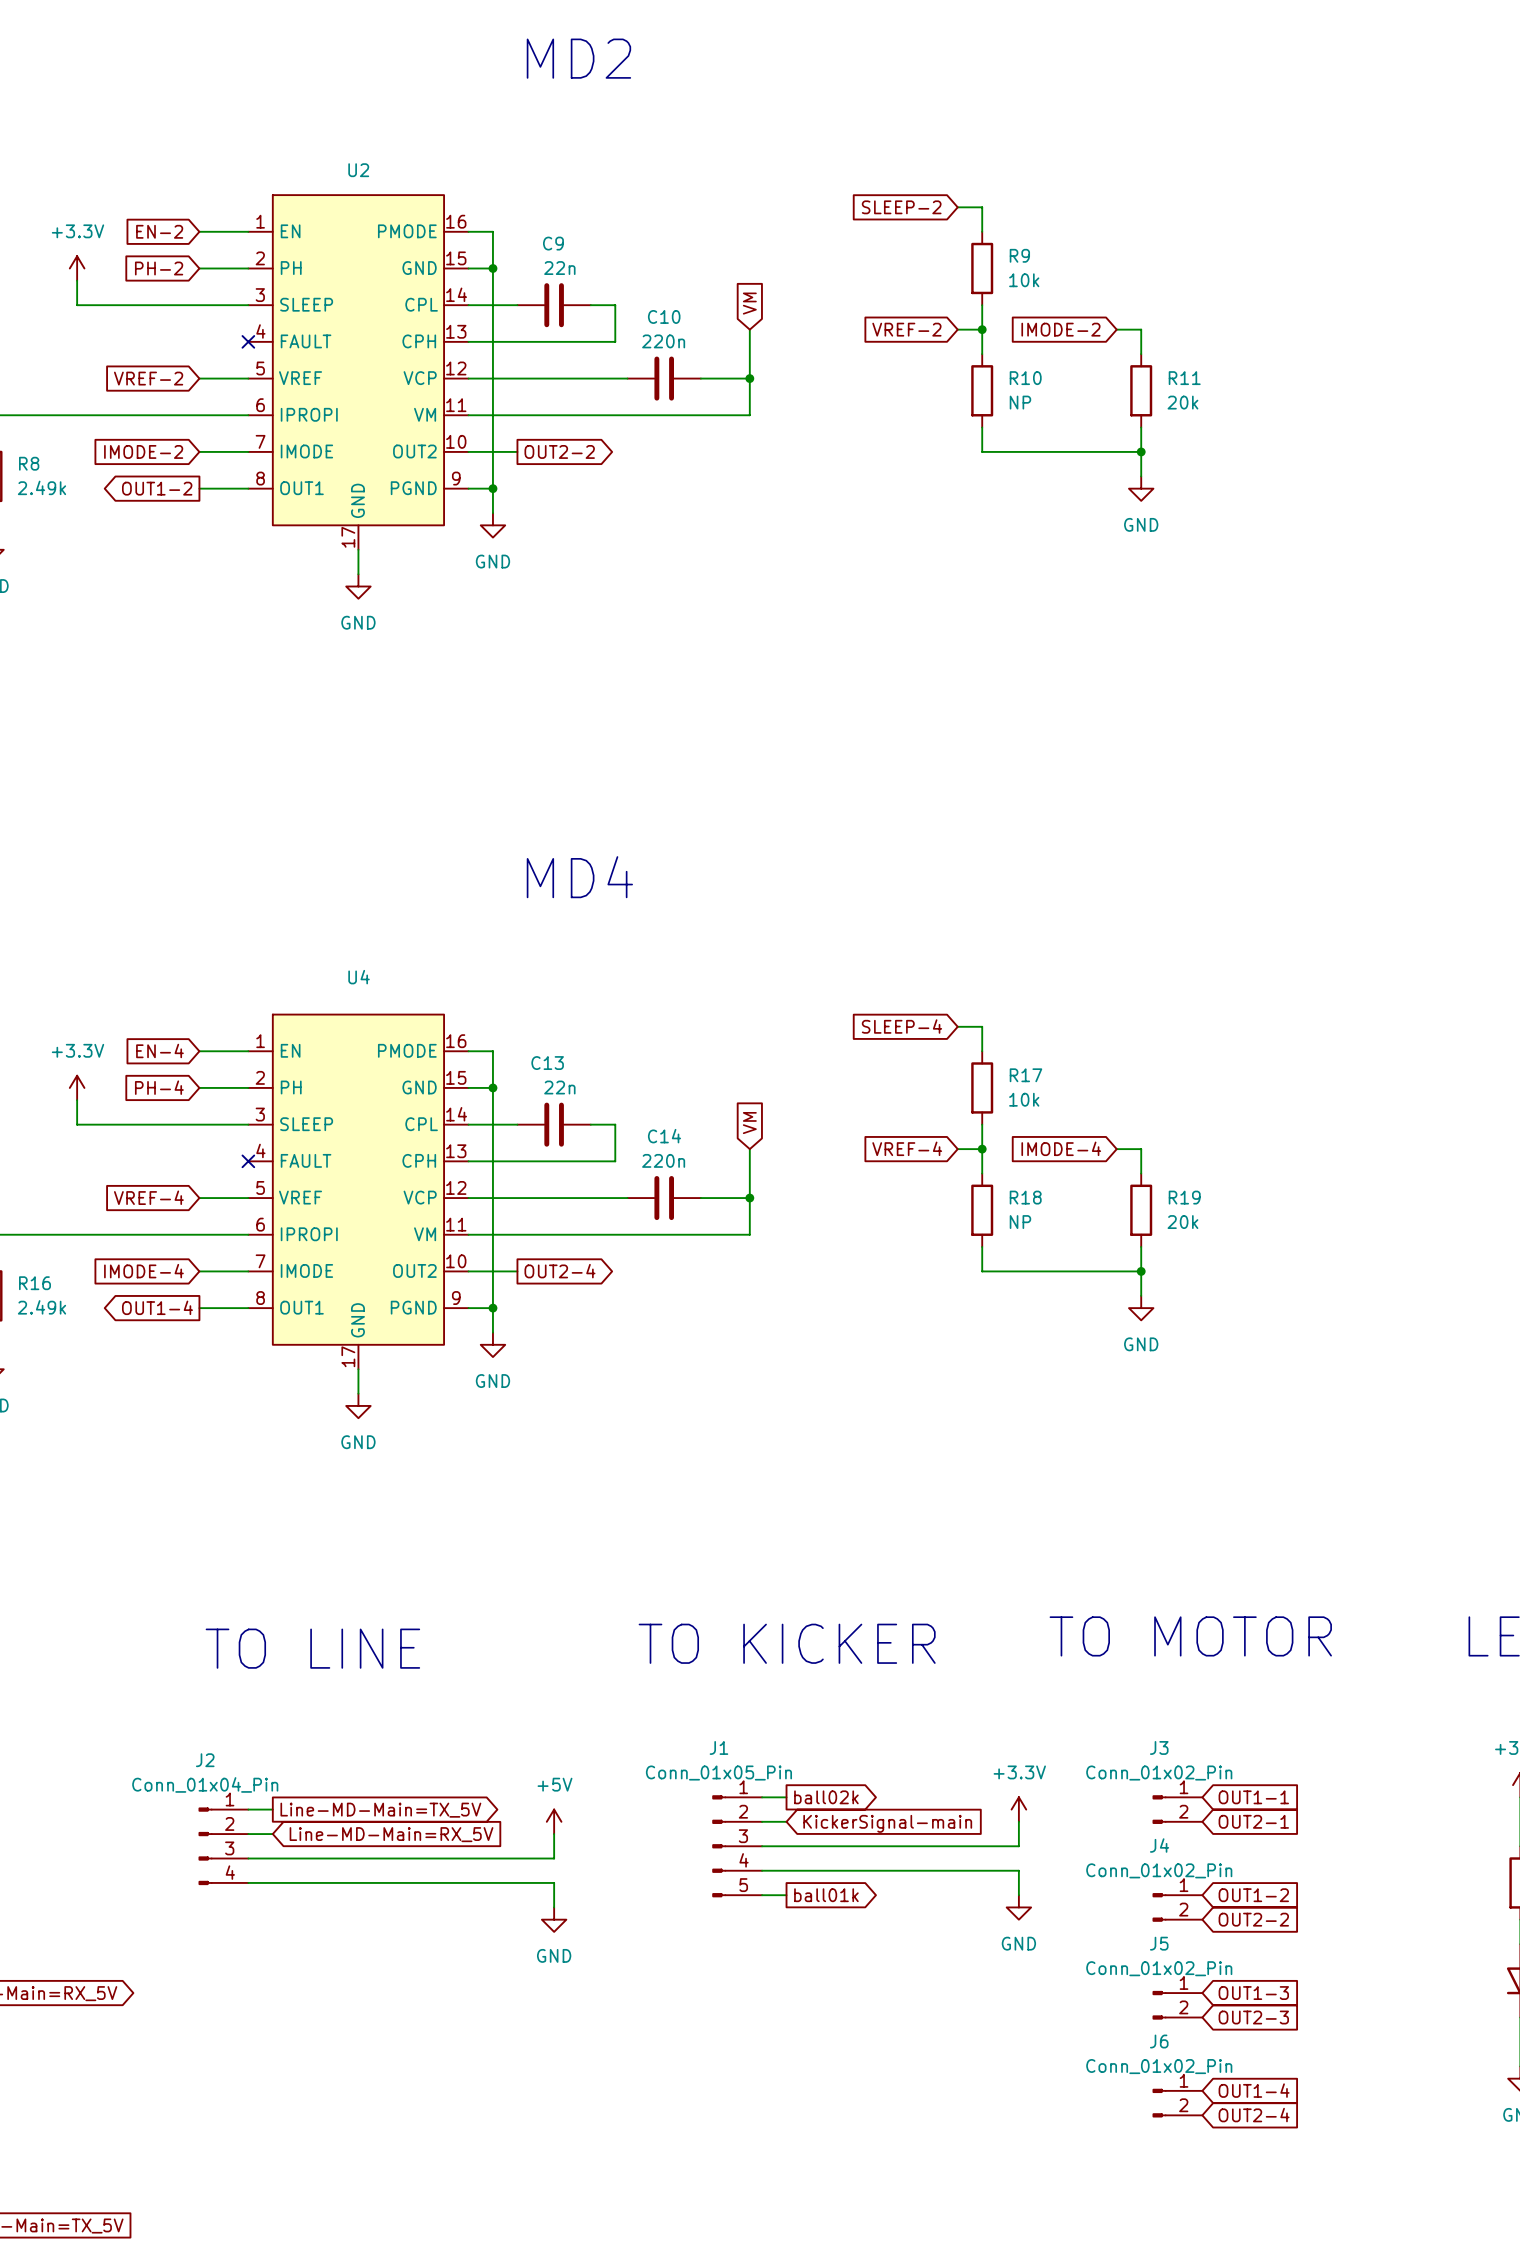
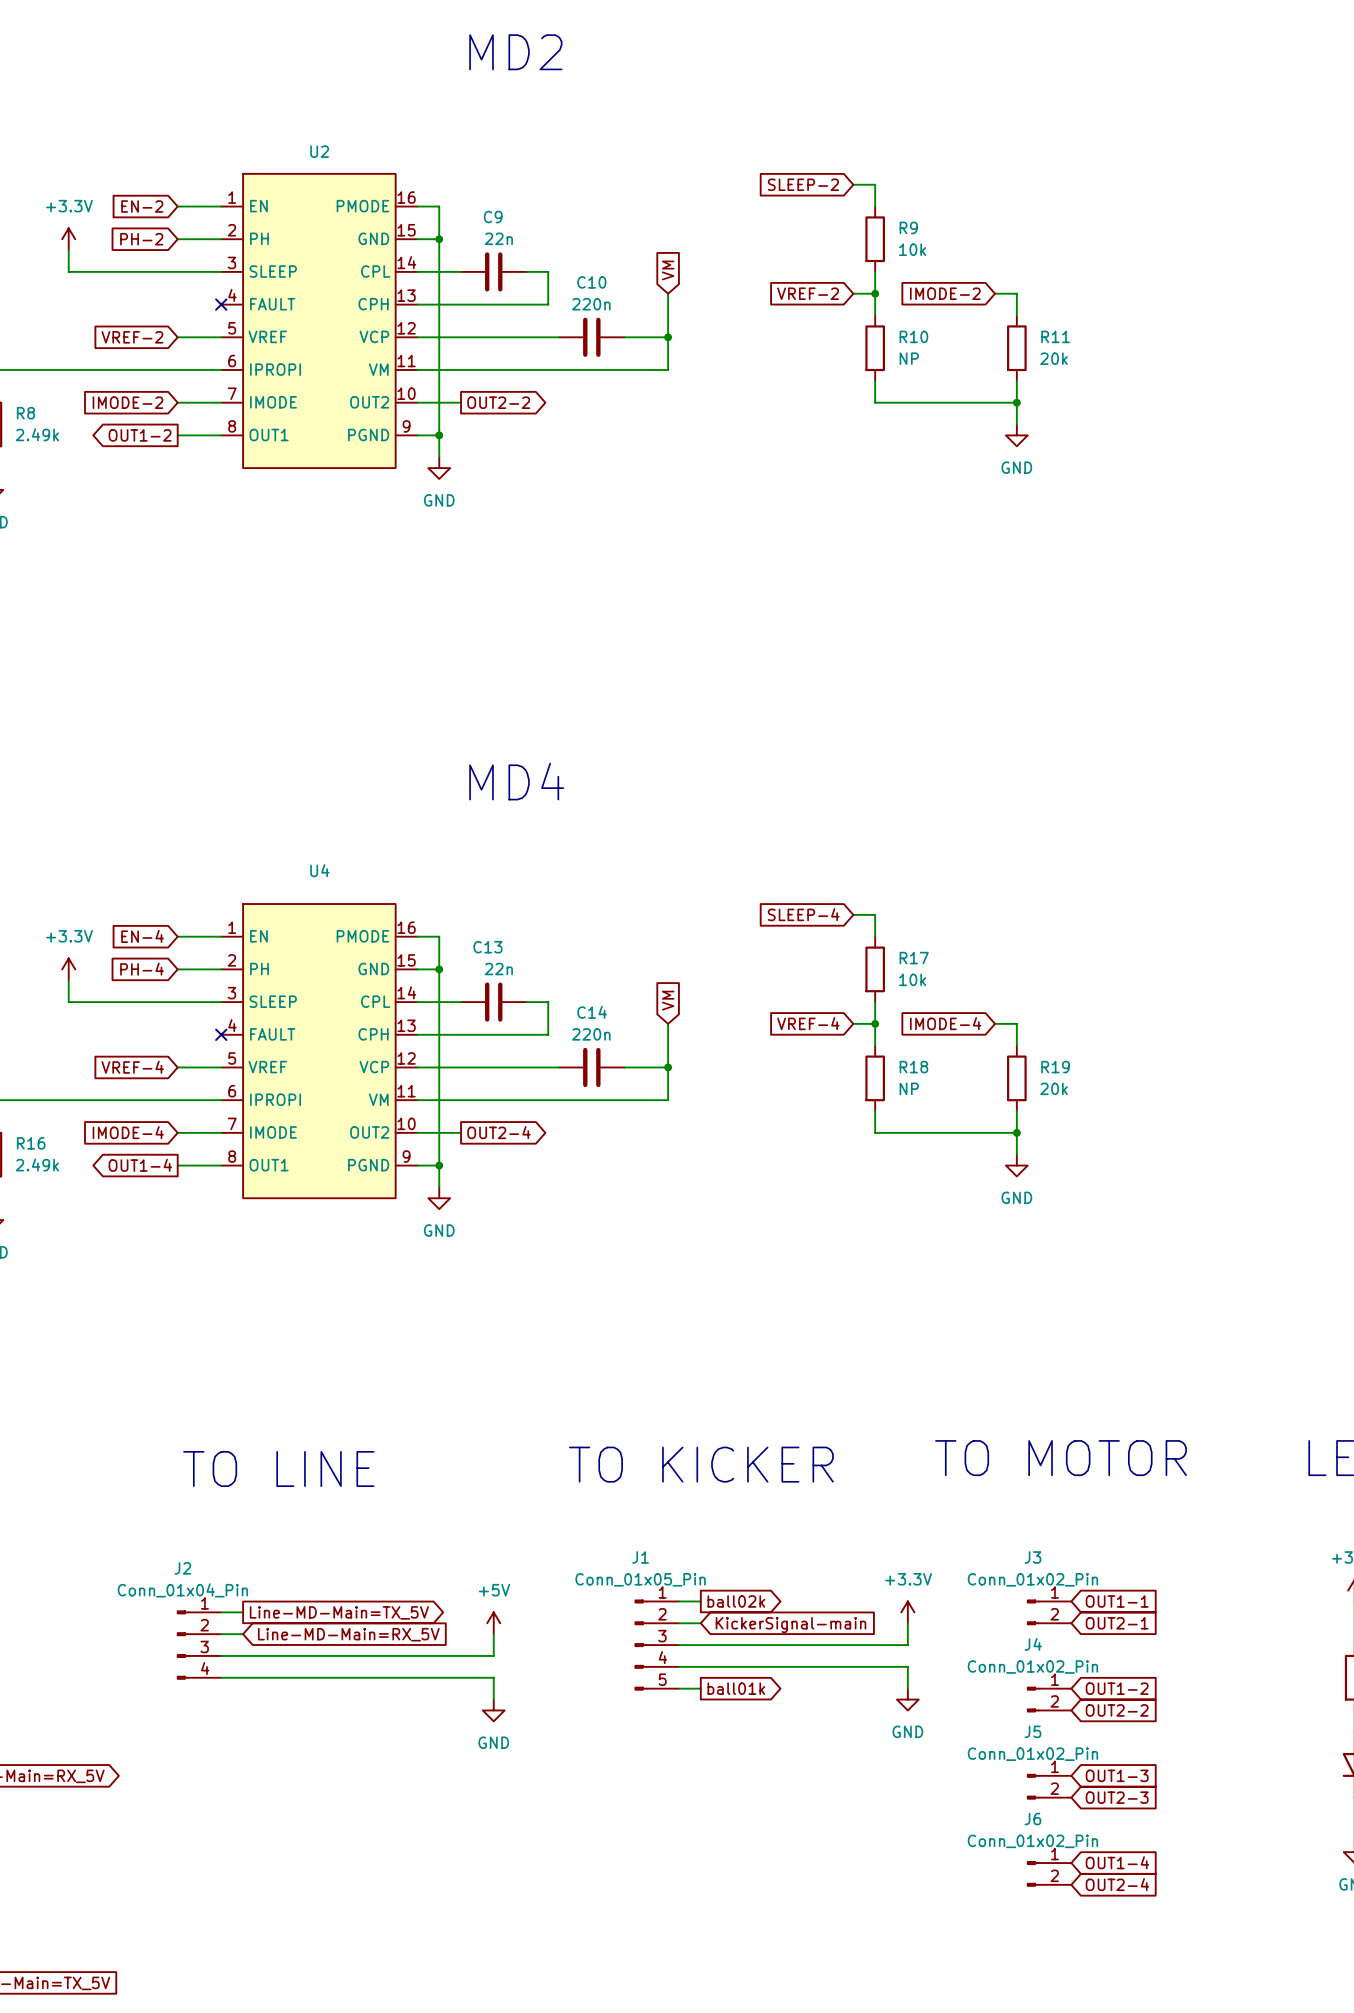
U2 symbol: [248, 195, 469, 550] -> [221, 173, 418, 469]
wire: (358, 549) (358, 574) -> none
power symbol: GND (358, 586) -> none
U4 symbol: [248, 1014, 469, 1370] -> [221, 904, 418, 1199]
wire: (358, 1369) (358, 1393) -> none
power symbol: GND (358, 1405) -> none

